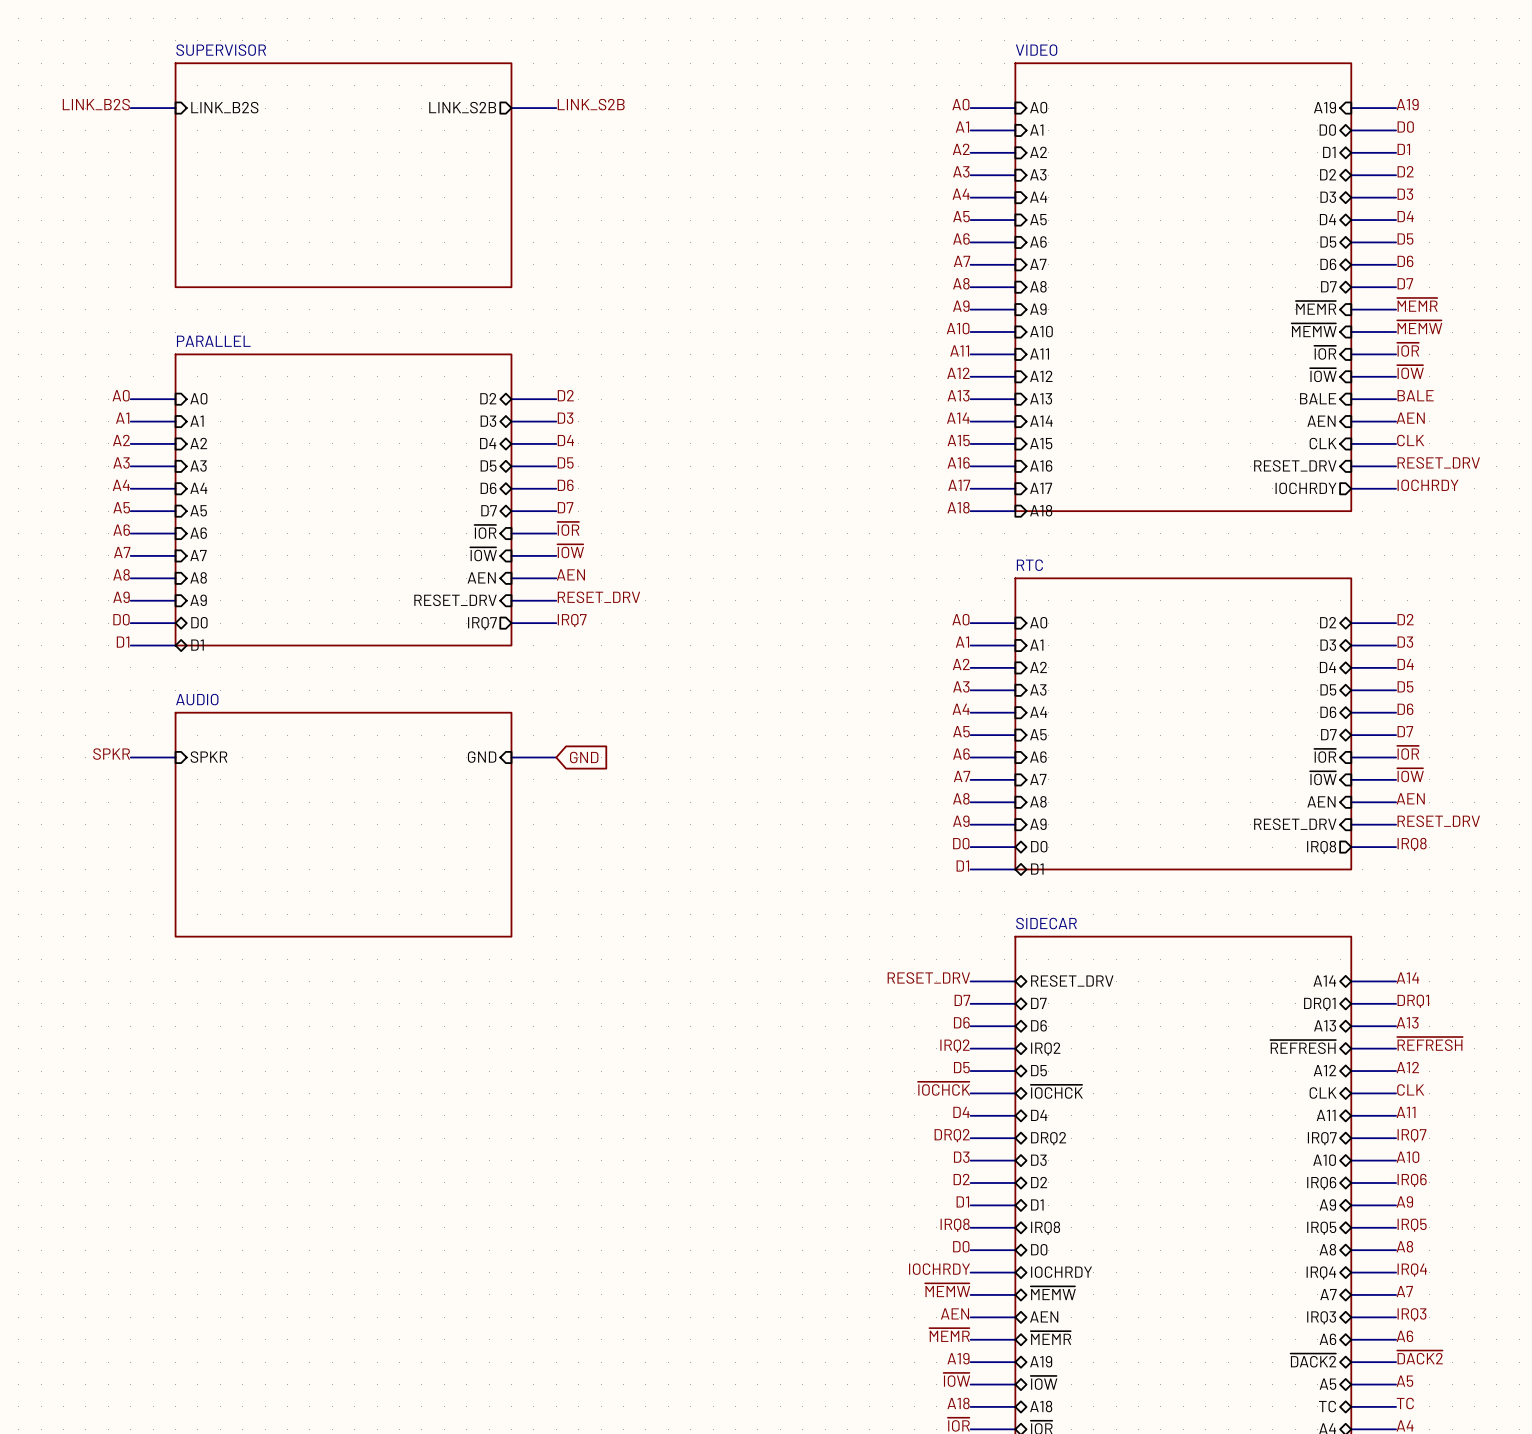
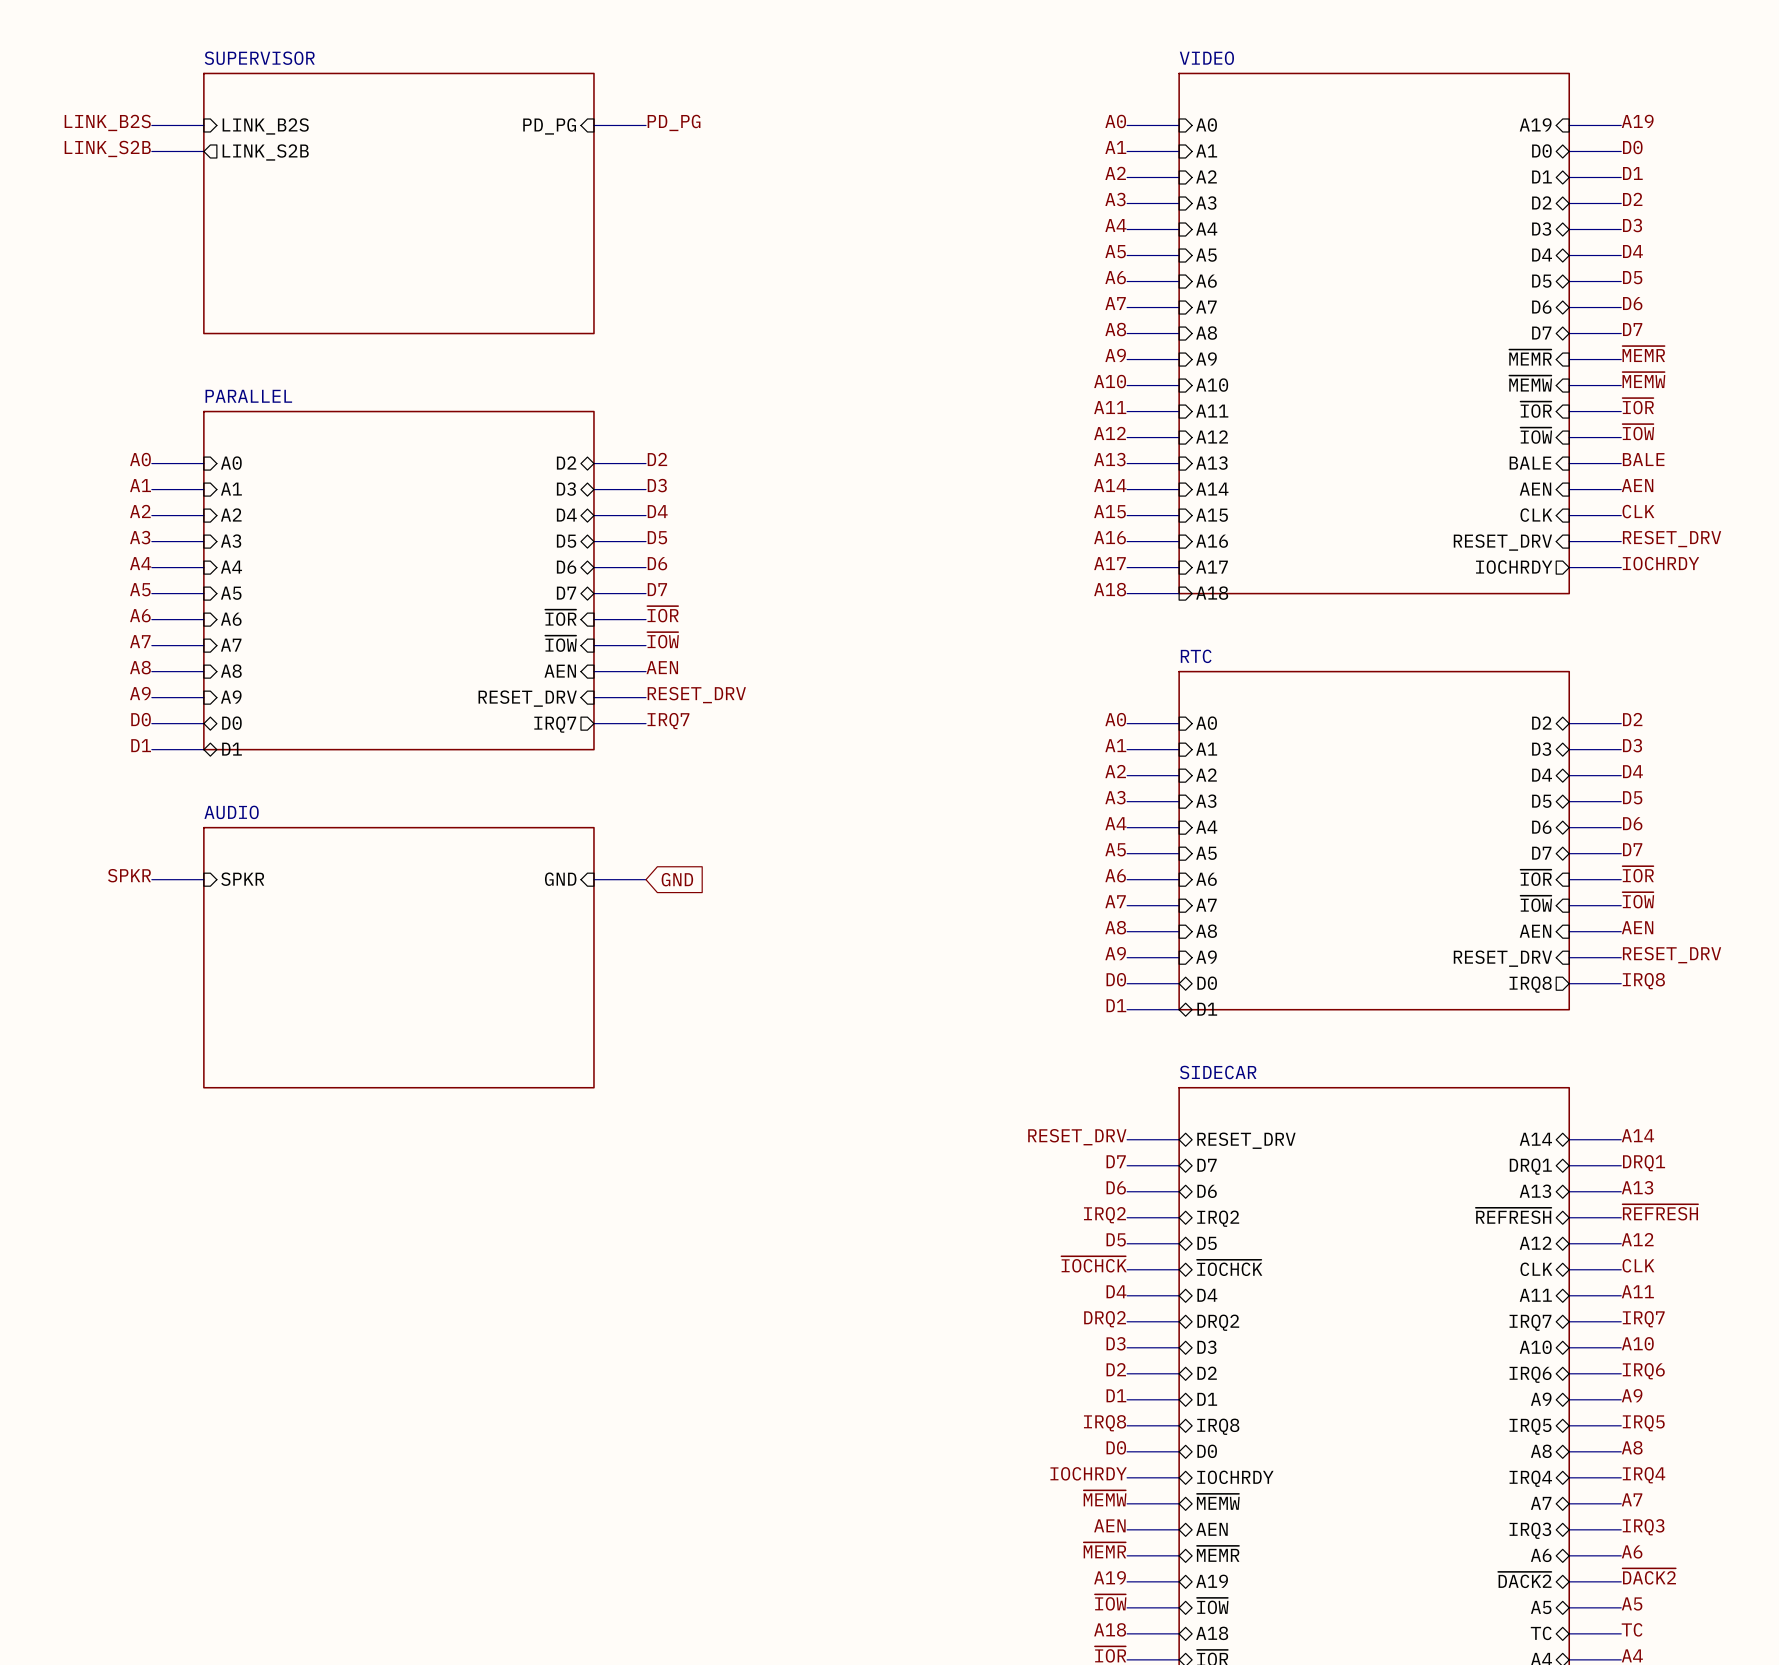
label: LINK_S2B (591, 104) -> PD_PG (674, 122)
sheet pin shape: output (462, 107) -> input (549, 126)
sheet pin: LINK_S2B (462, 107) -> PD_PG (549, 126)
label: none -> LINK_S2B (107, 148)
wire: none -> (151, 151) (203, 151)
sheet pin: none -> LINK_S2B (265, 152)

